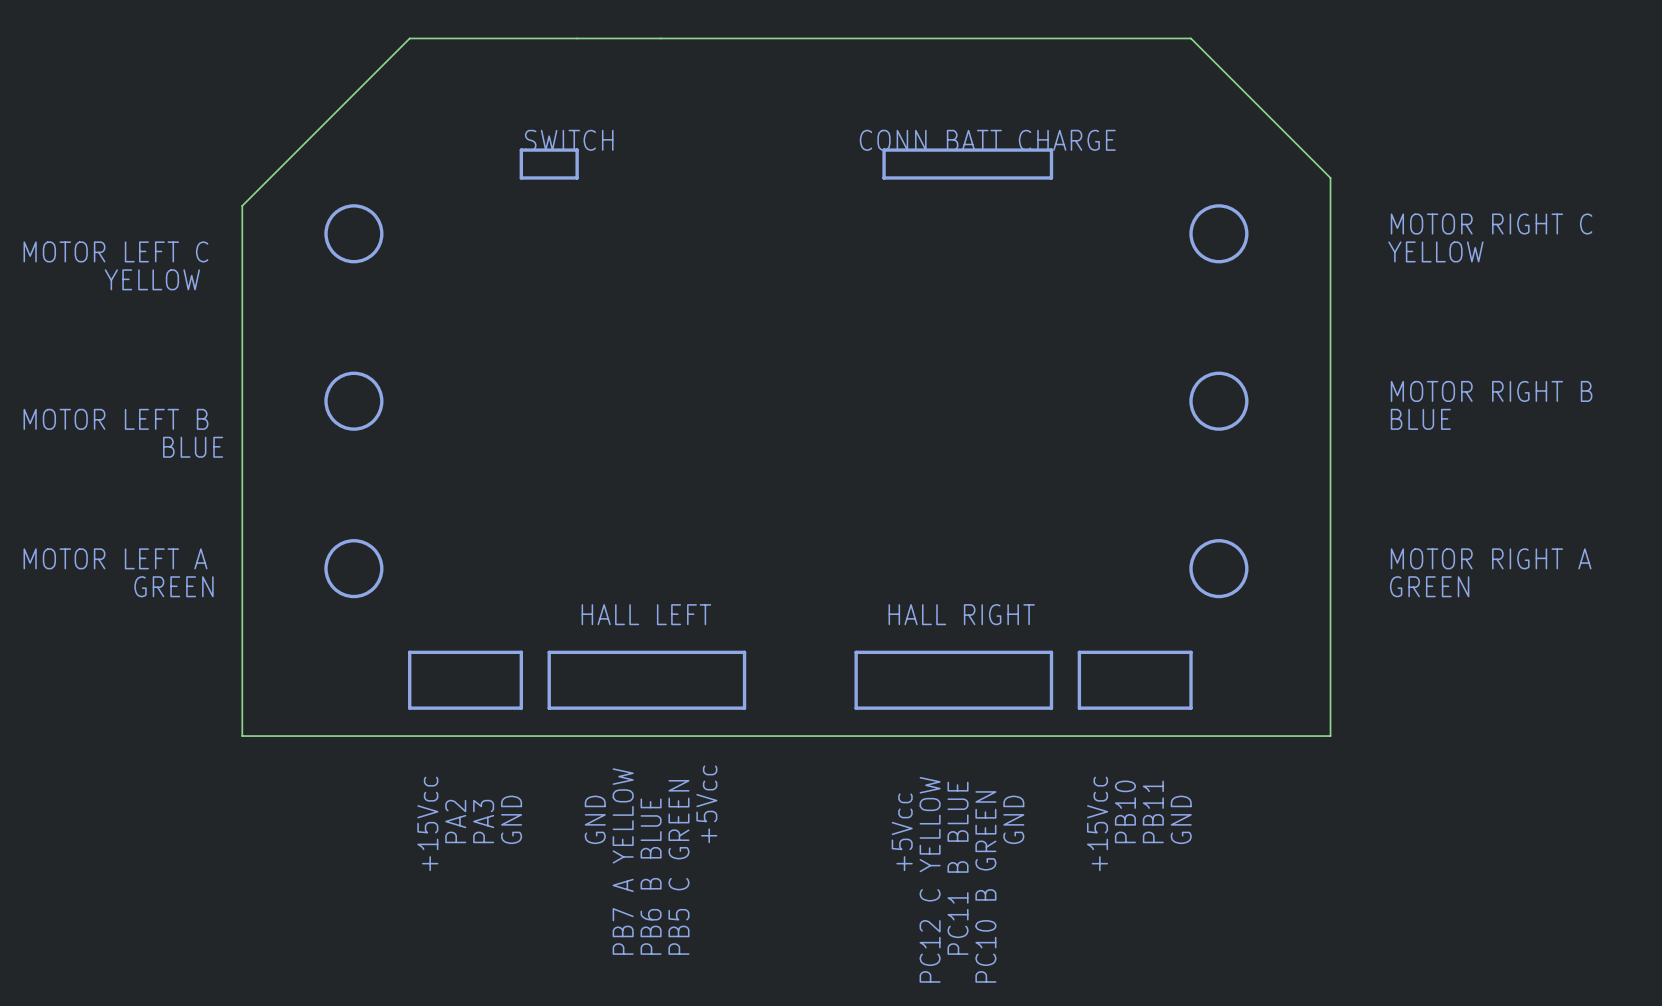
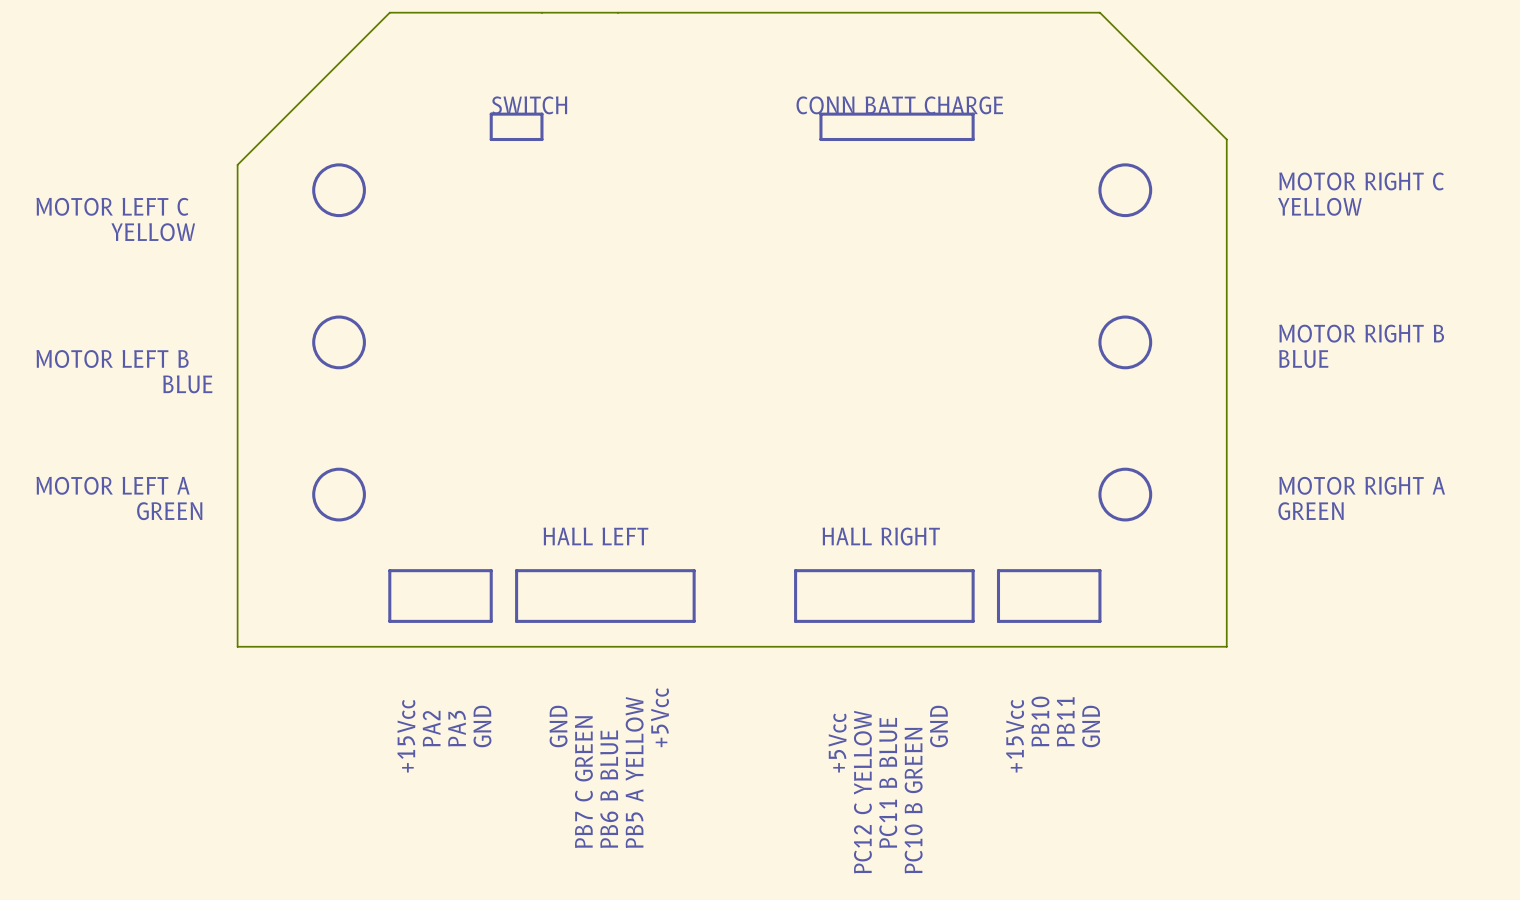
text: PB7 A YELLOW (623, 861) -> PB7 C GREEN (583, 782)
text: PB5 C GREEN (678, 867) -> PB5 A YELLOW (634, 772)

